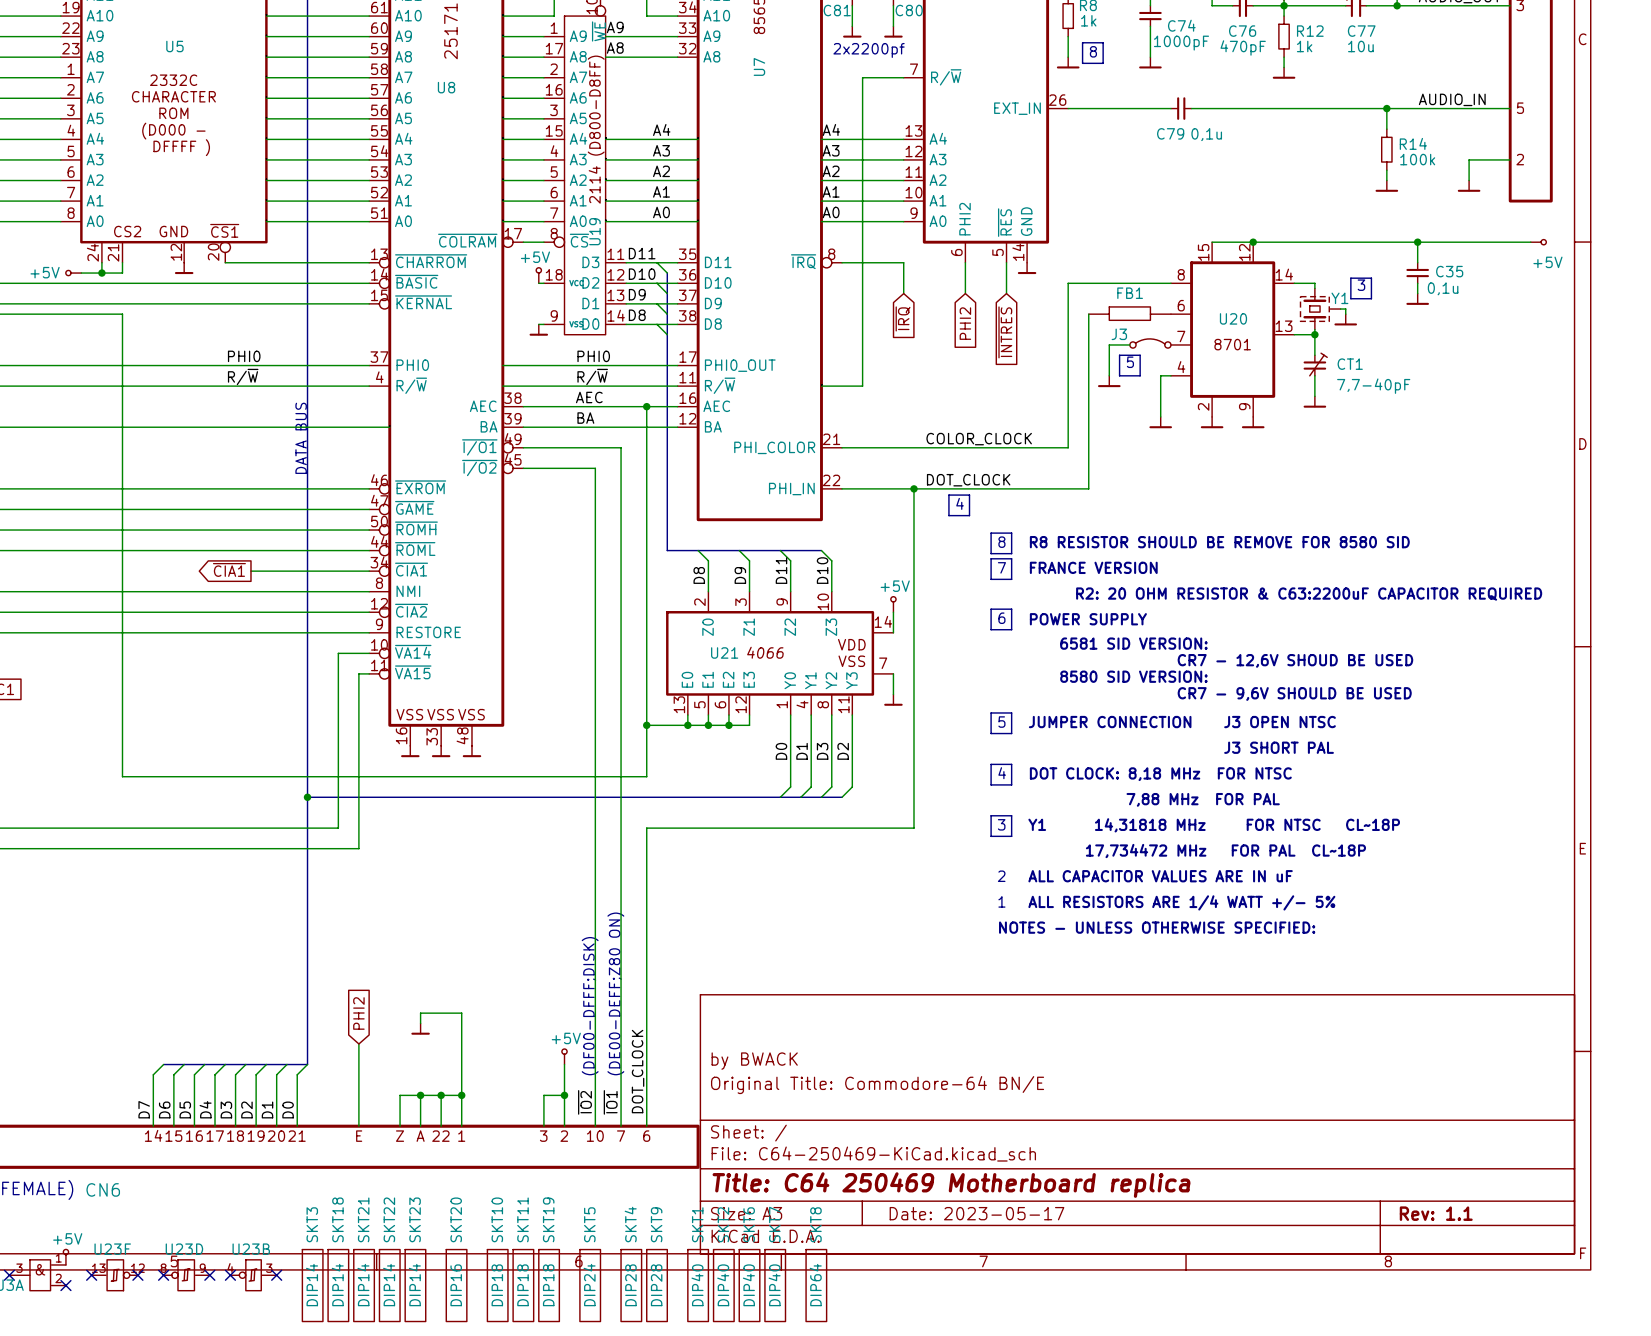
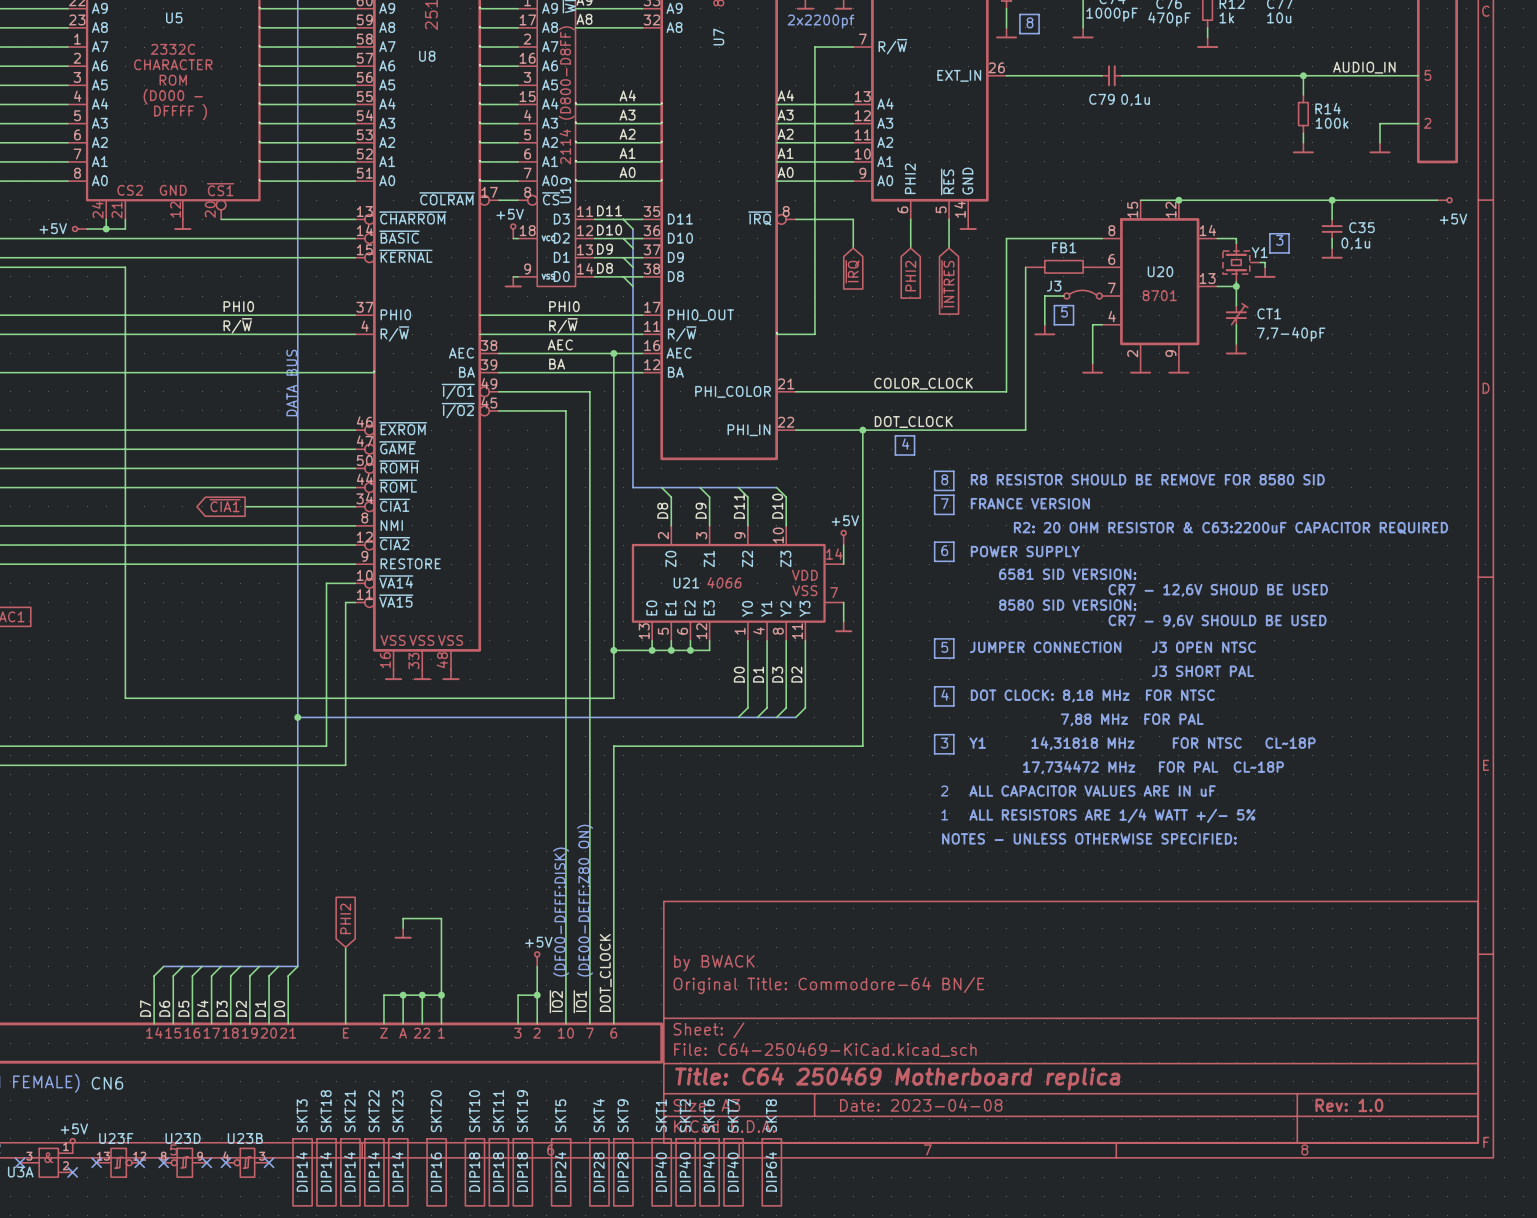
title block: Date: 2023-05-17 (976, 1213) -> Date: 2023-04-08 (921, 1105)
title block: Rev: 1.1 (1436, 1213) -> Rev: 1.0 (1349, 1105)

